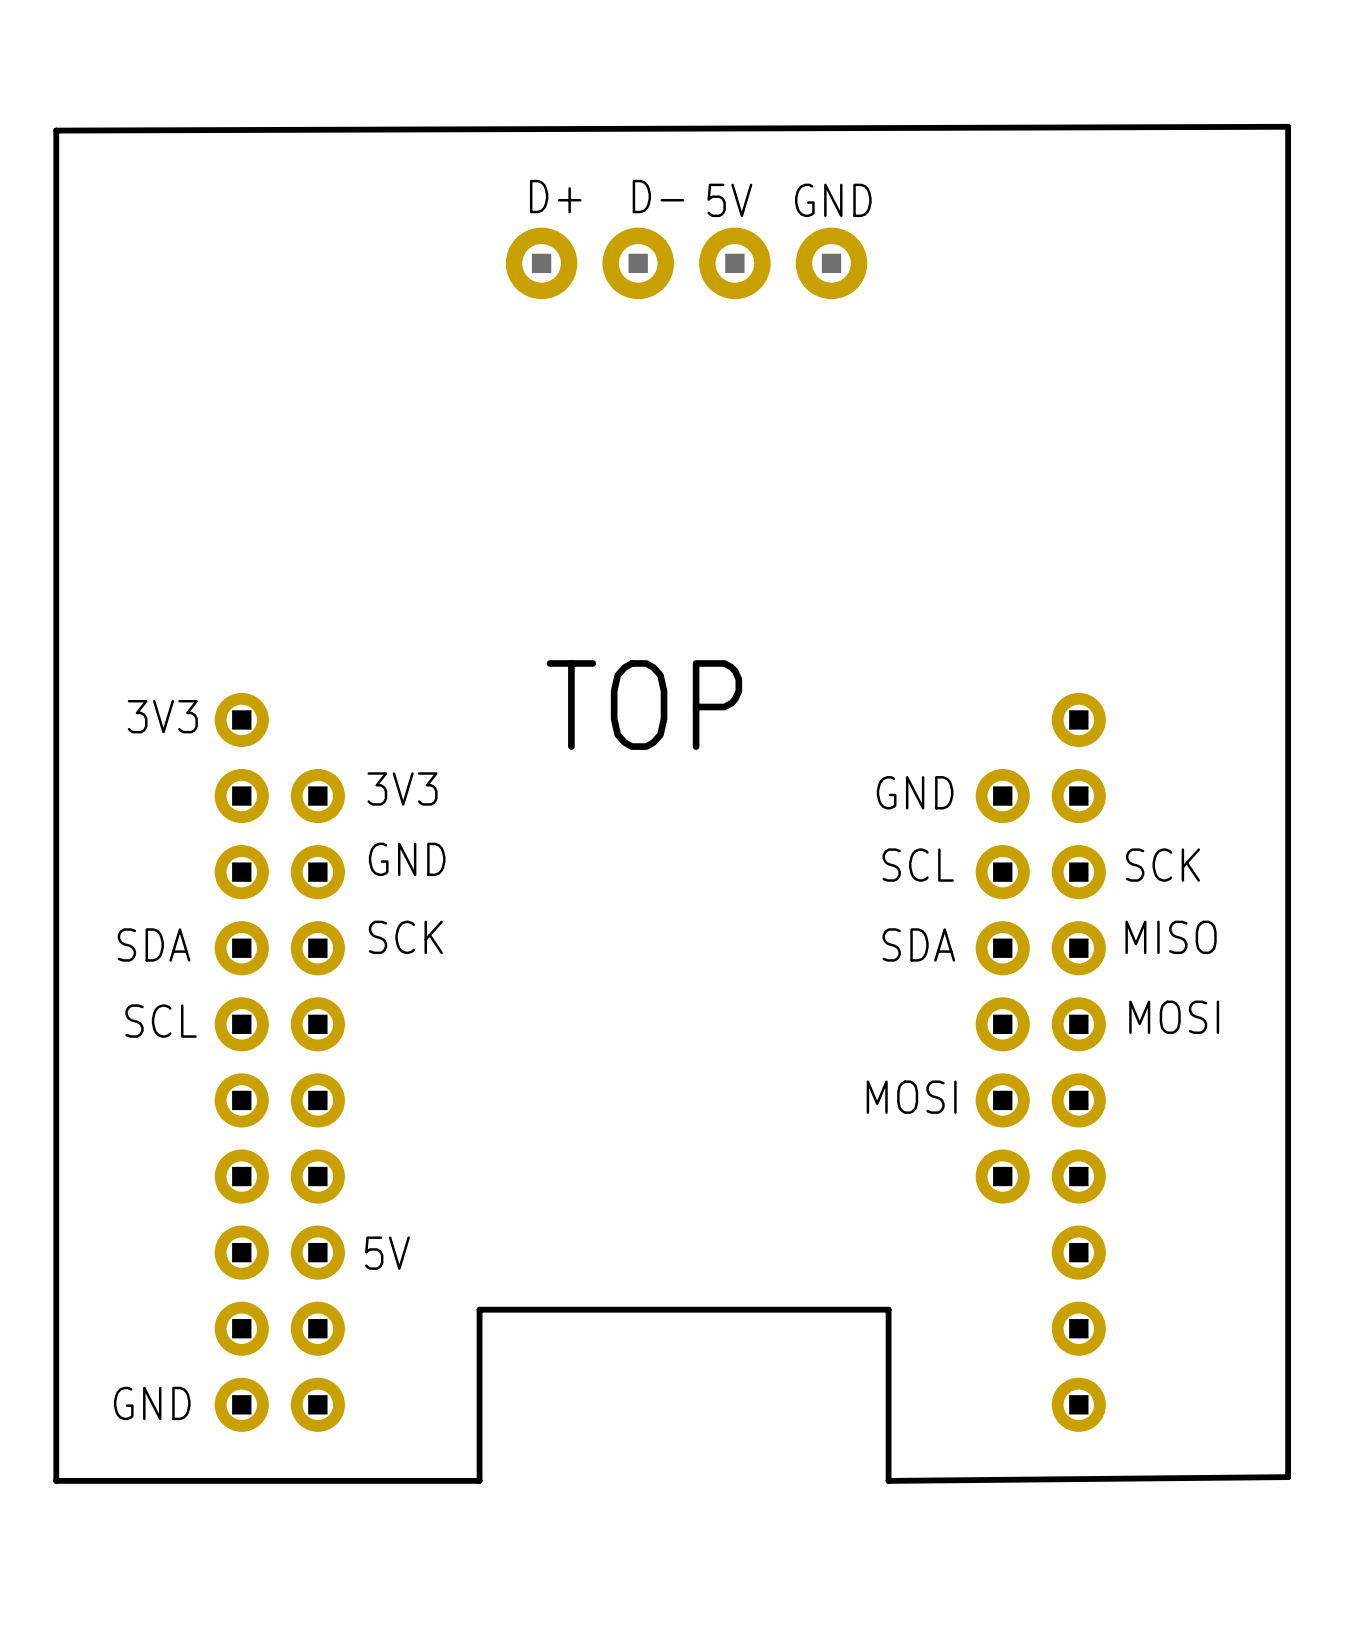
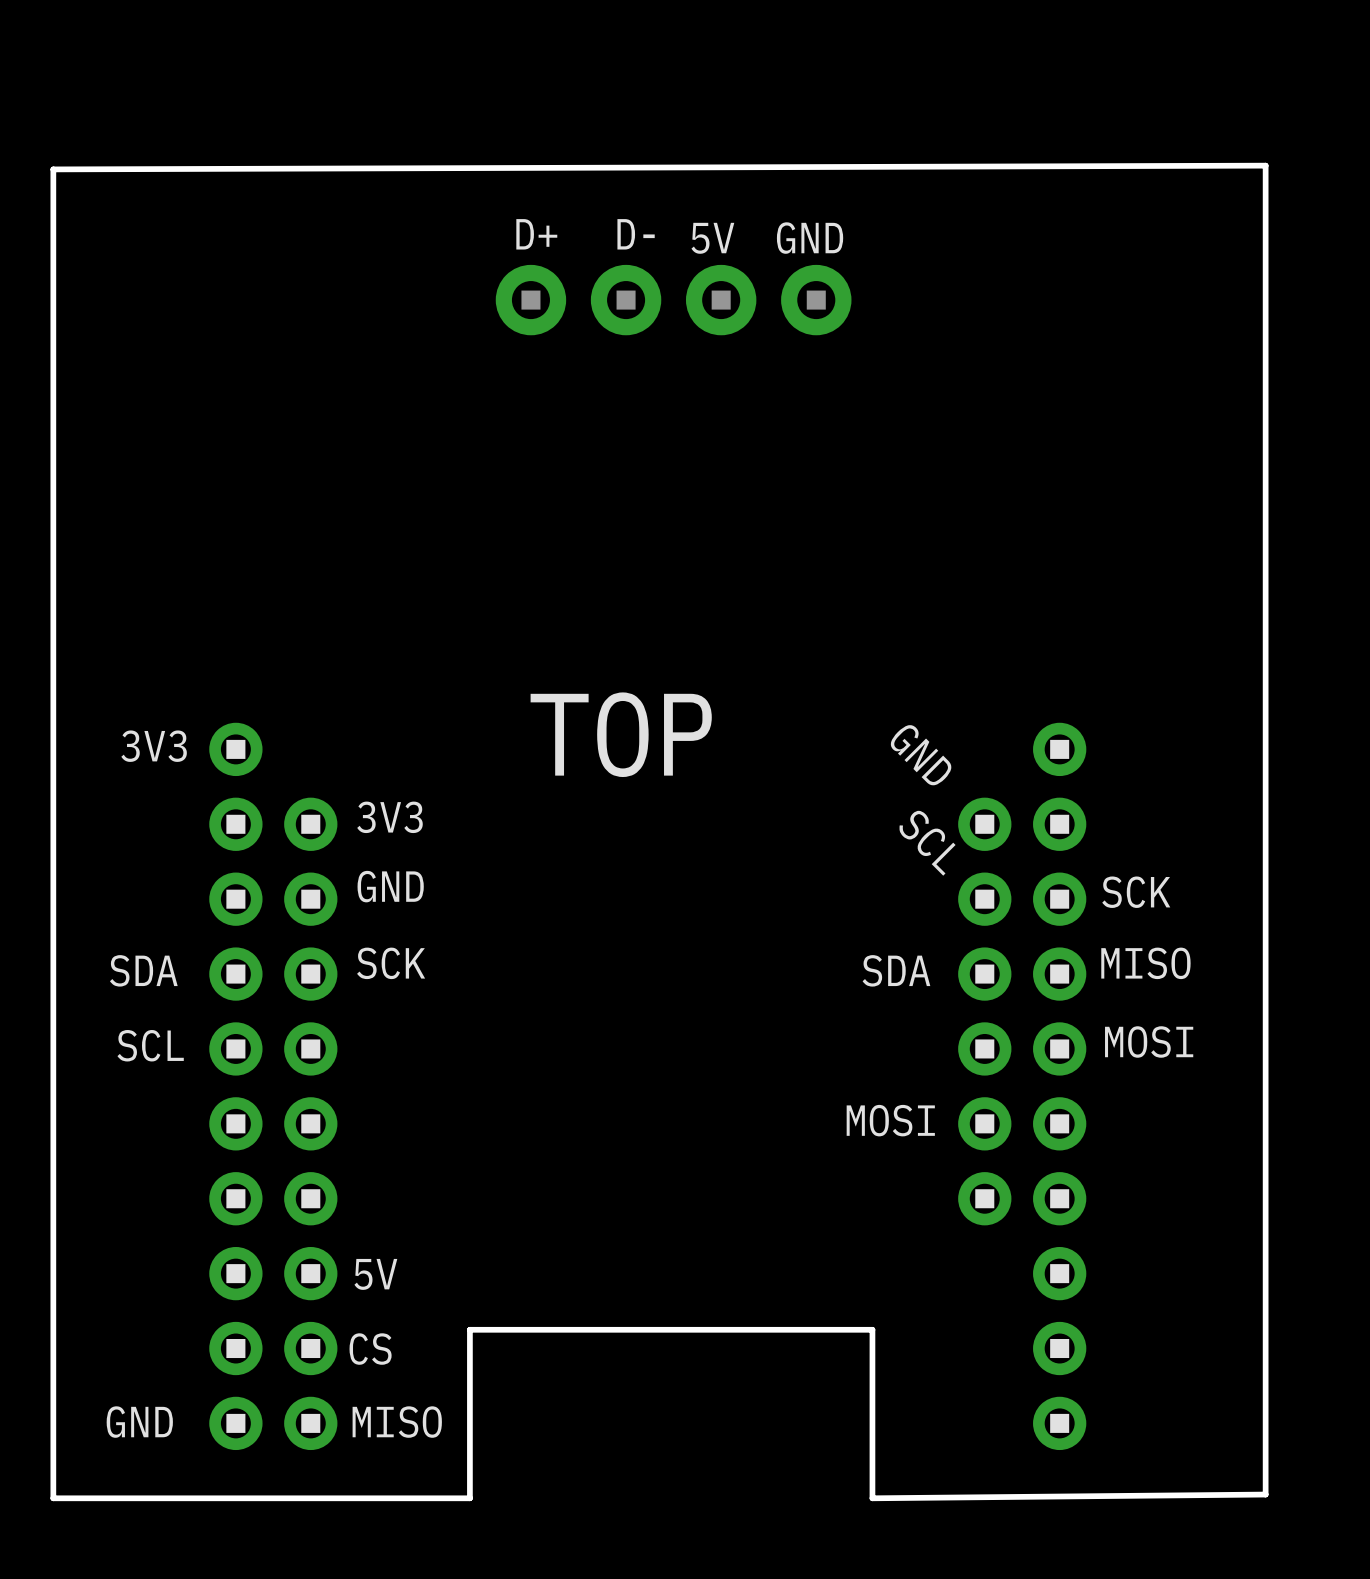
text rotation: 0° (915, 792) -> 45° clockwise (921, 755)
text rotation: 0° (918, 865) -> 45° clockwise (927, 843)
text: none -> CS (370, 1349)
text: none -> MISO (397, 1422)

